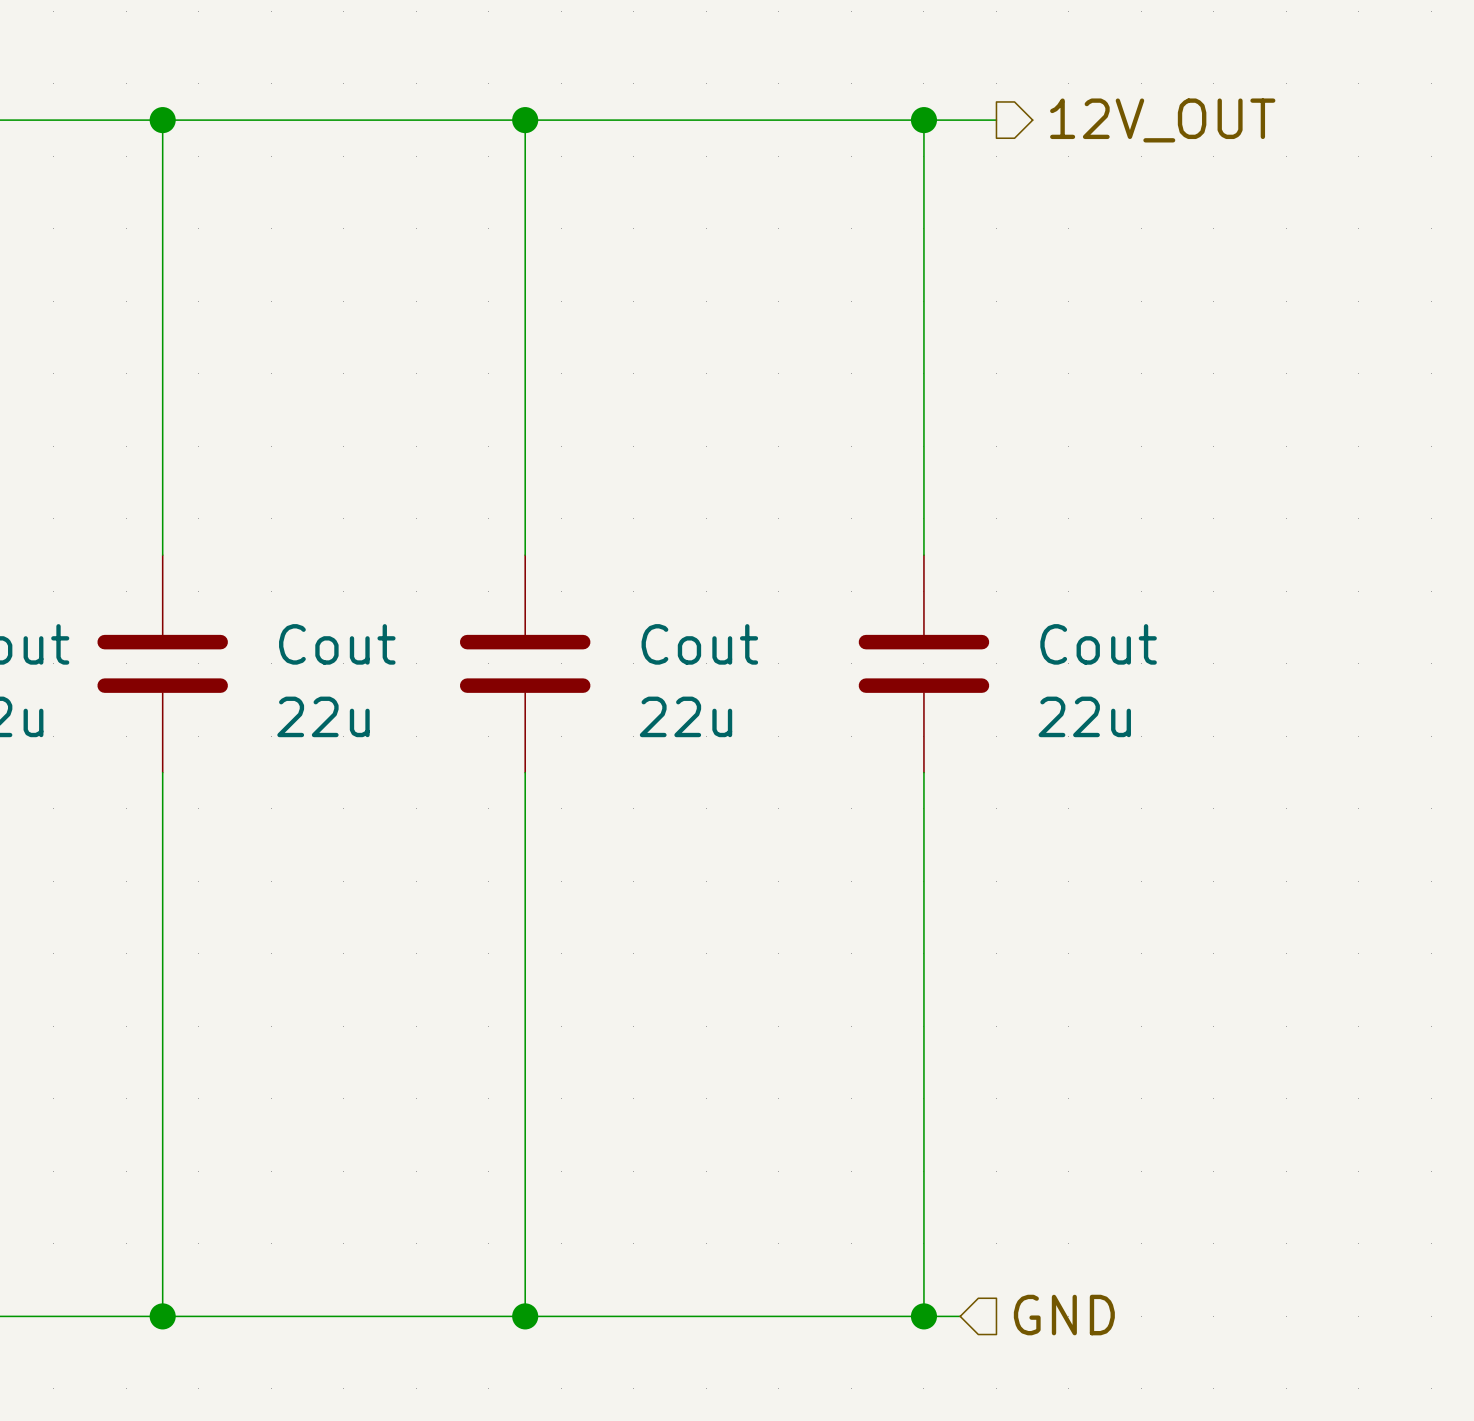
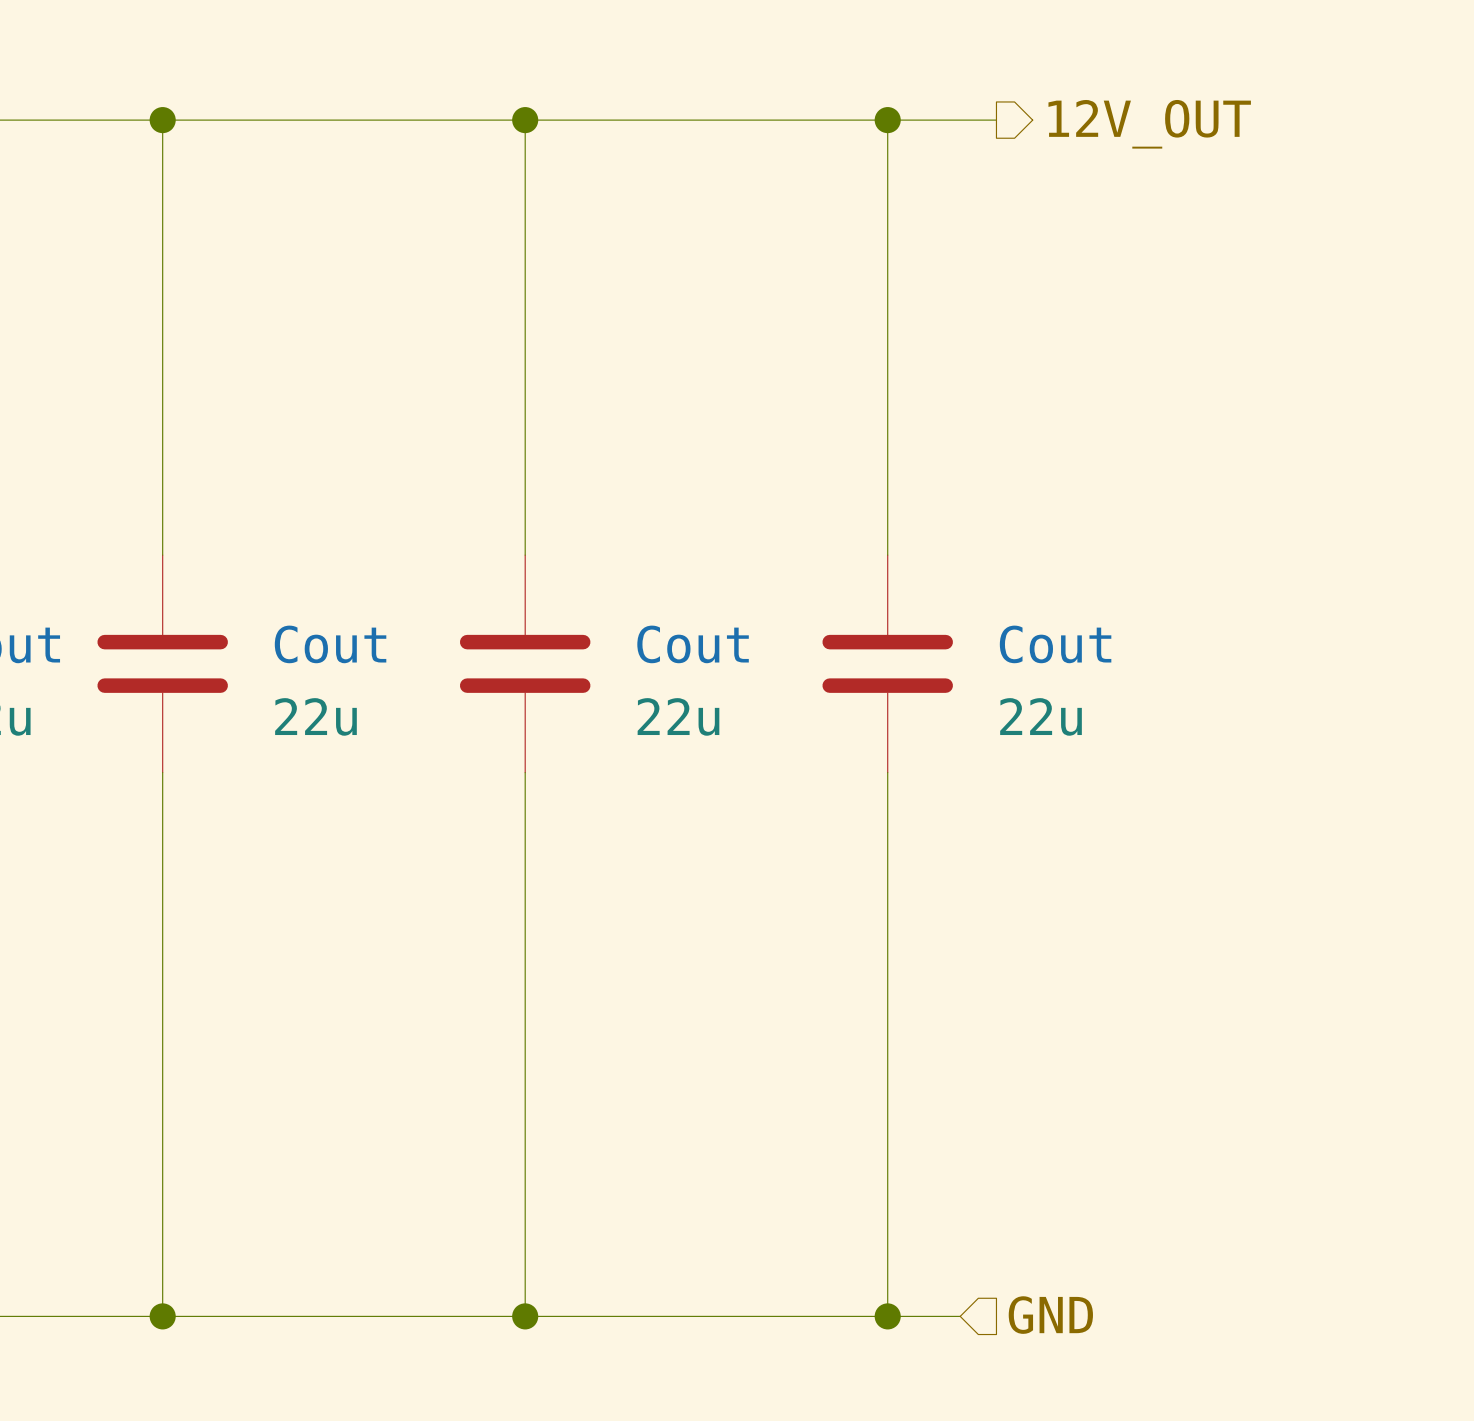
wire: (923, 120) (923, 555) -> (887, 120) (887, 555)
junction position: (923, 120) -> (887, 120)
Cout position: (923, 663) -> (887, 663)
wire: (923, 772) (923, 1316) -> (887, 772) (887, 1316)
junction position: (923, 1316) -> (887, 1316)

